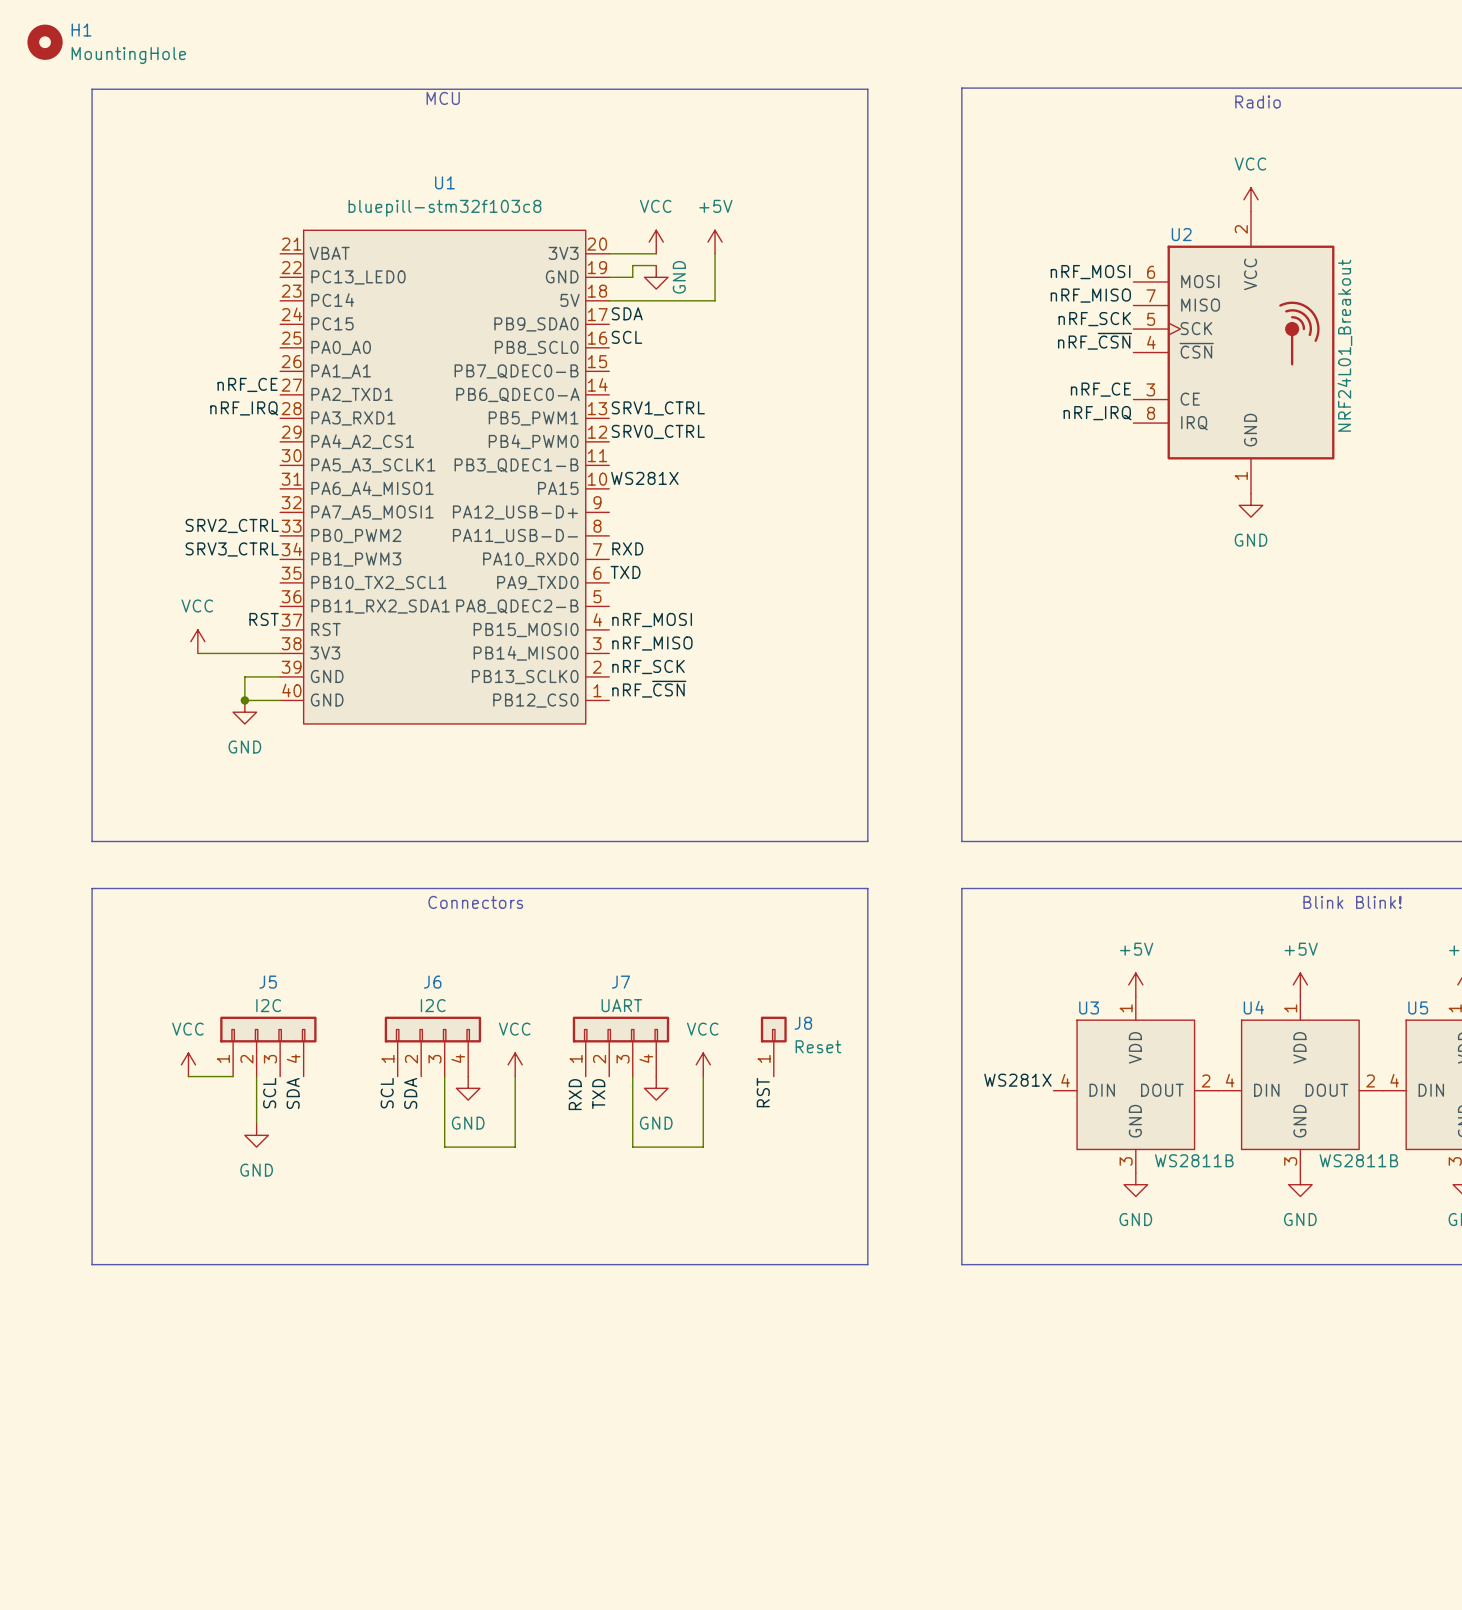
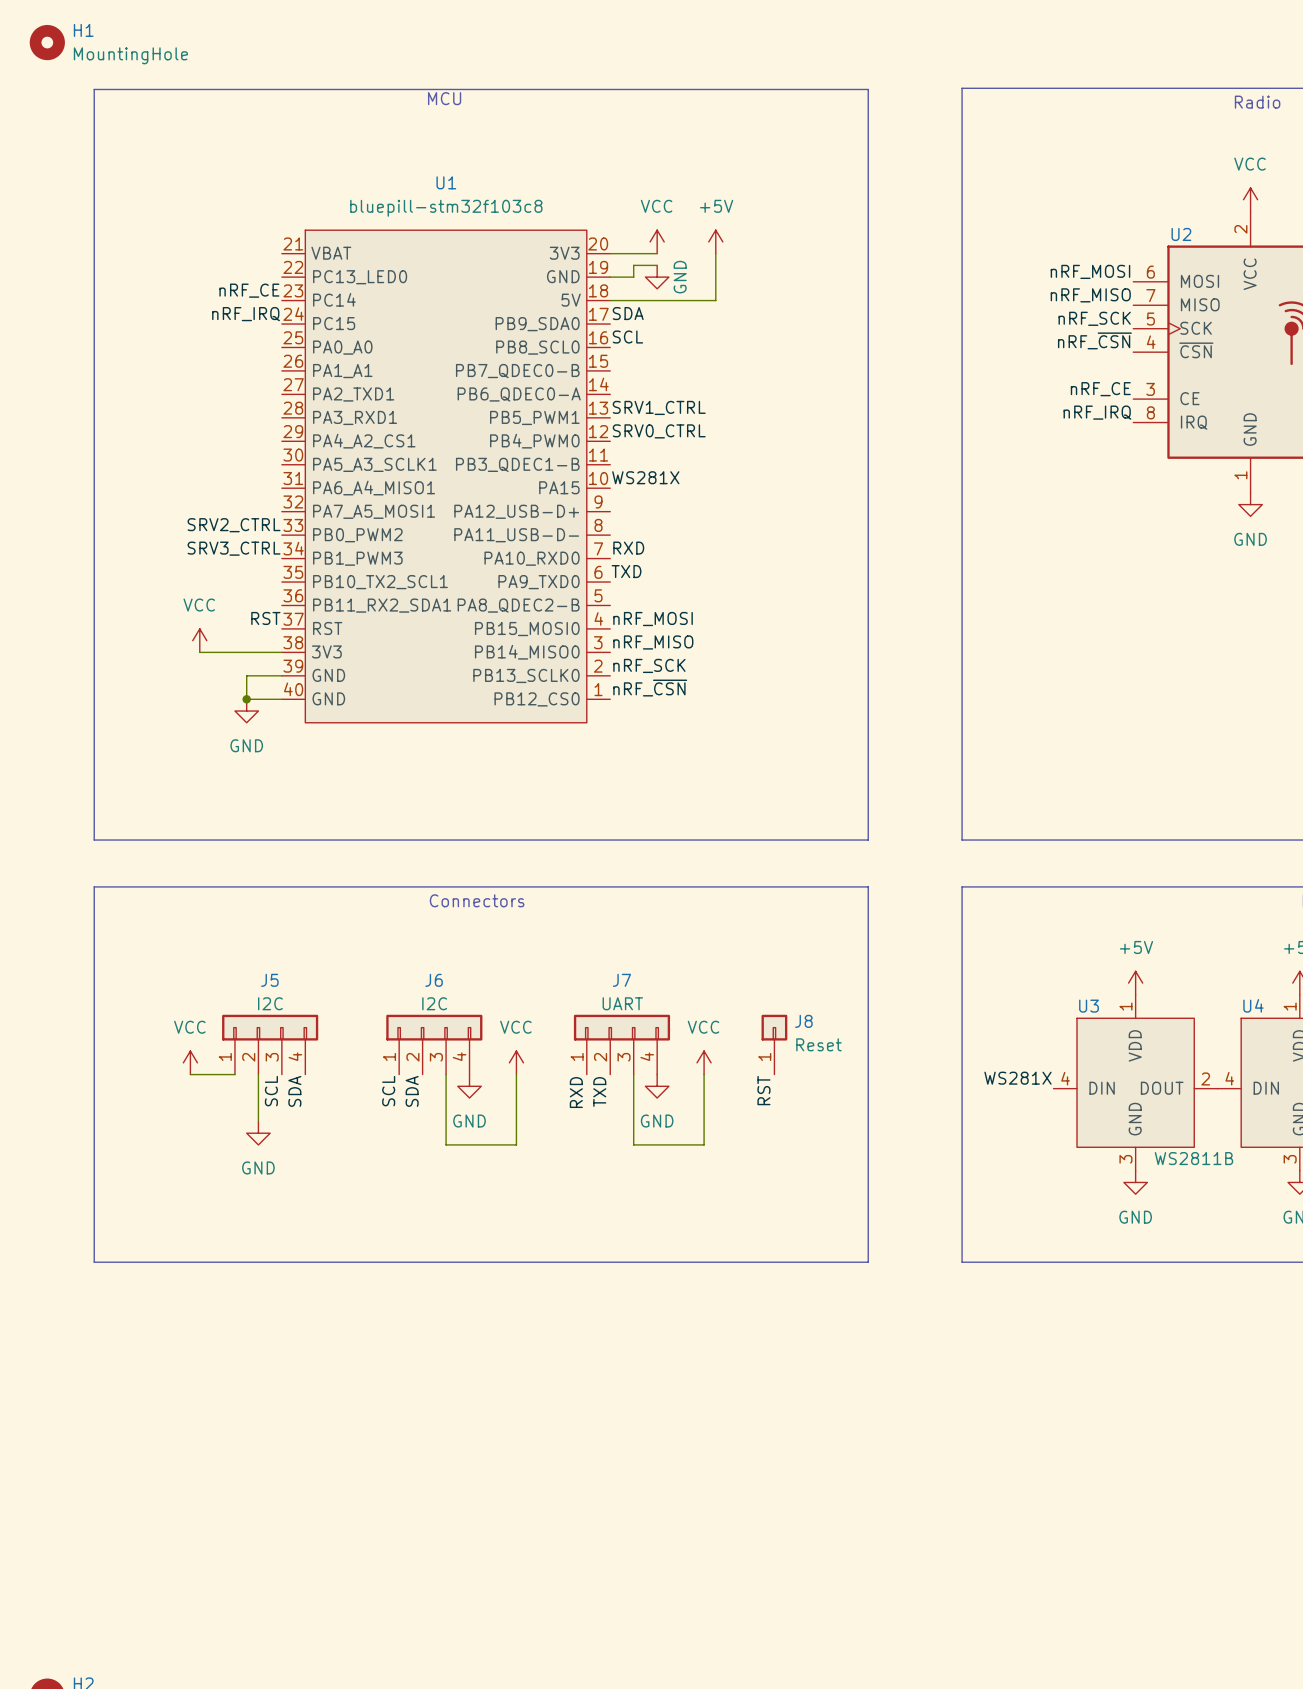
label position: nRF_CE (247, 384) -> nRF_CE (249, 290)
label position: nRF_IRQ (244, 408) -> nRF_IRQ (246, 314)

